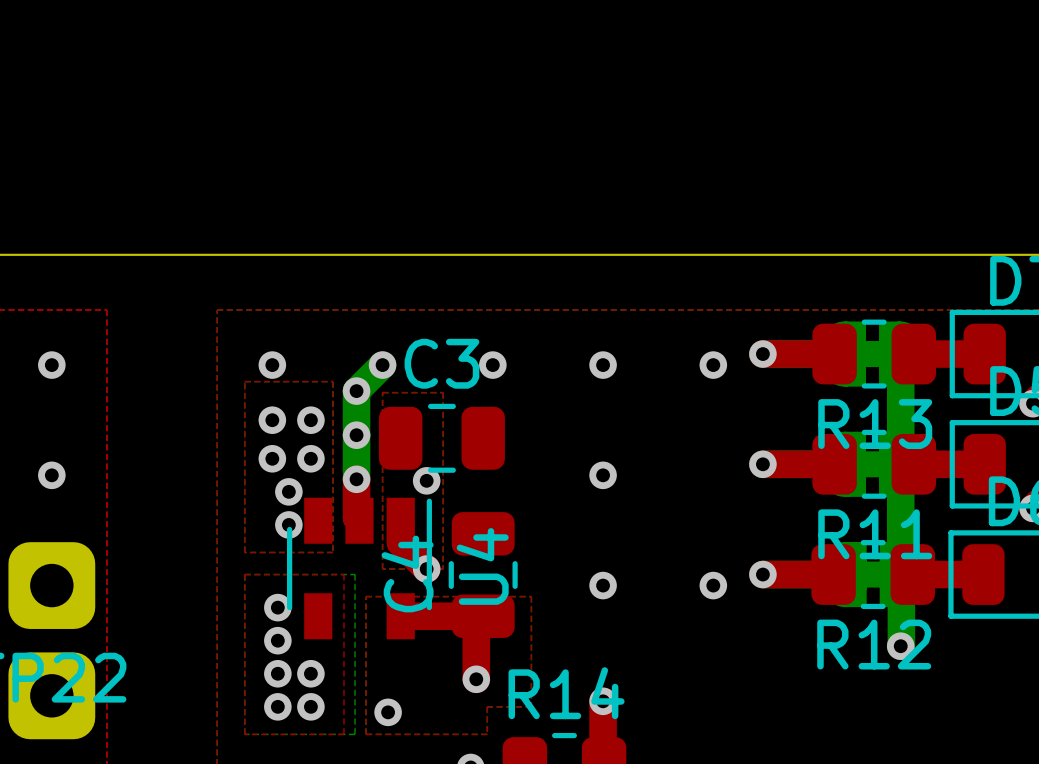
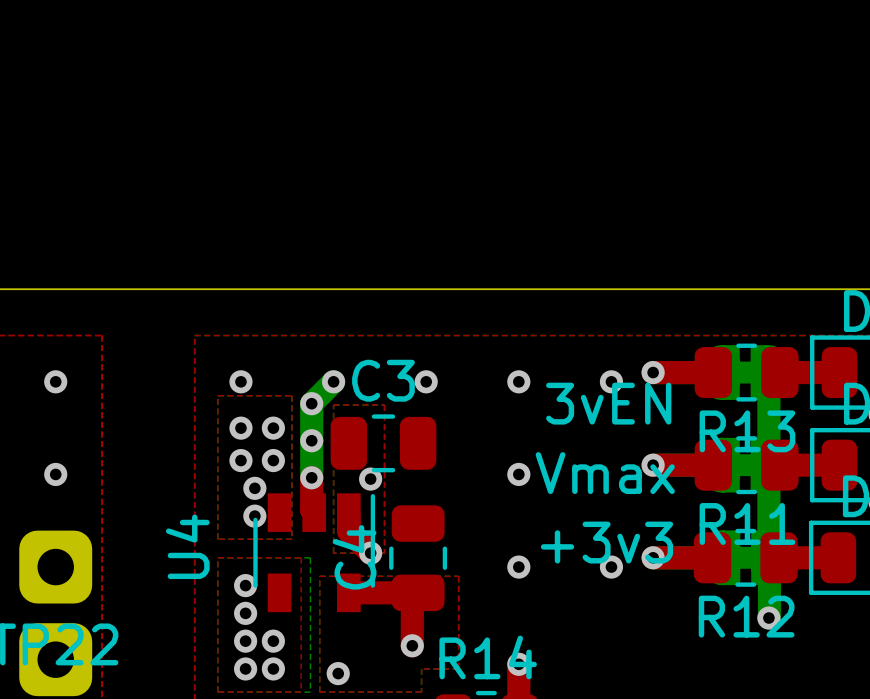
text: none -> 3vEN (608, 403)
text: none -> Vmax (605, 473)
text: none -> +3v3 (606, 542)
U4 name position: U4 (482, 566) -> U4 (187, 546)

